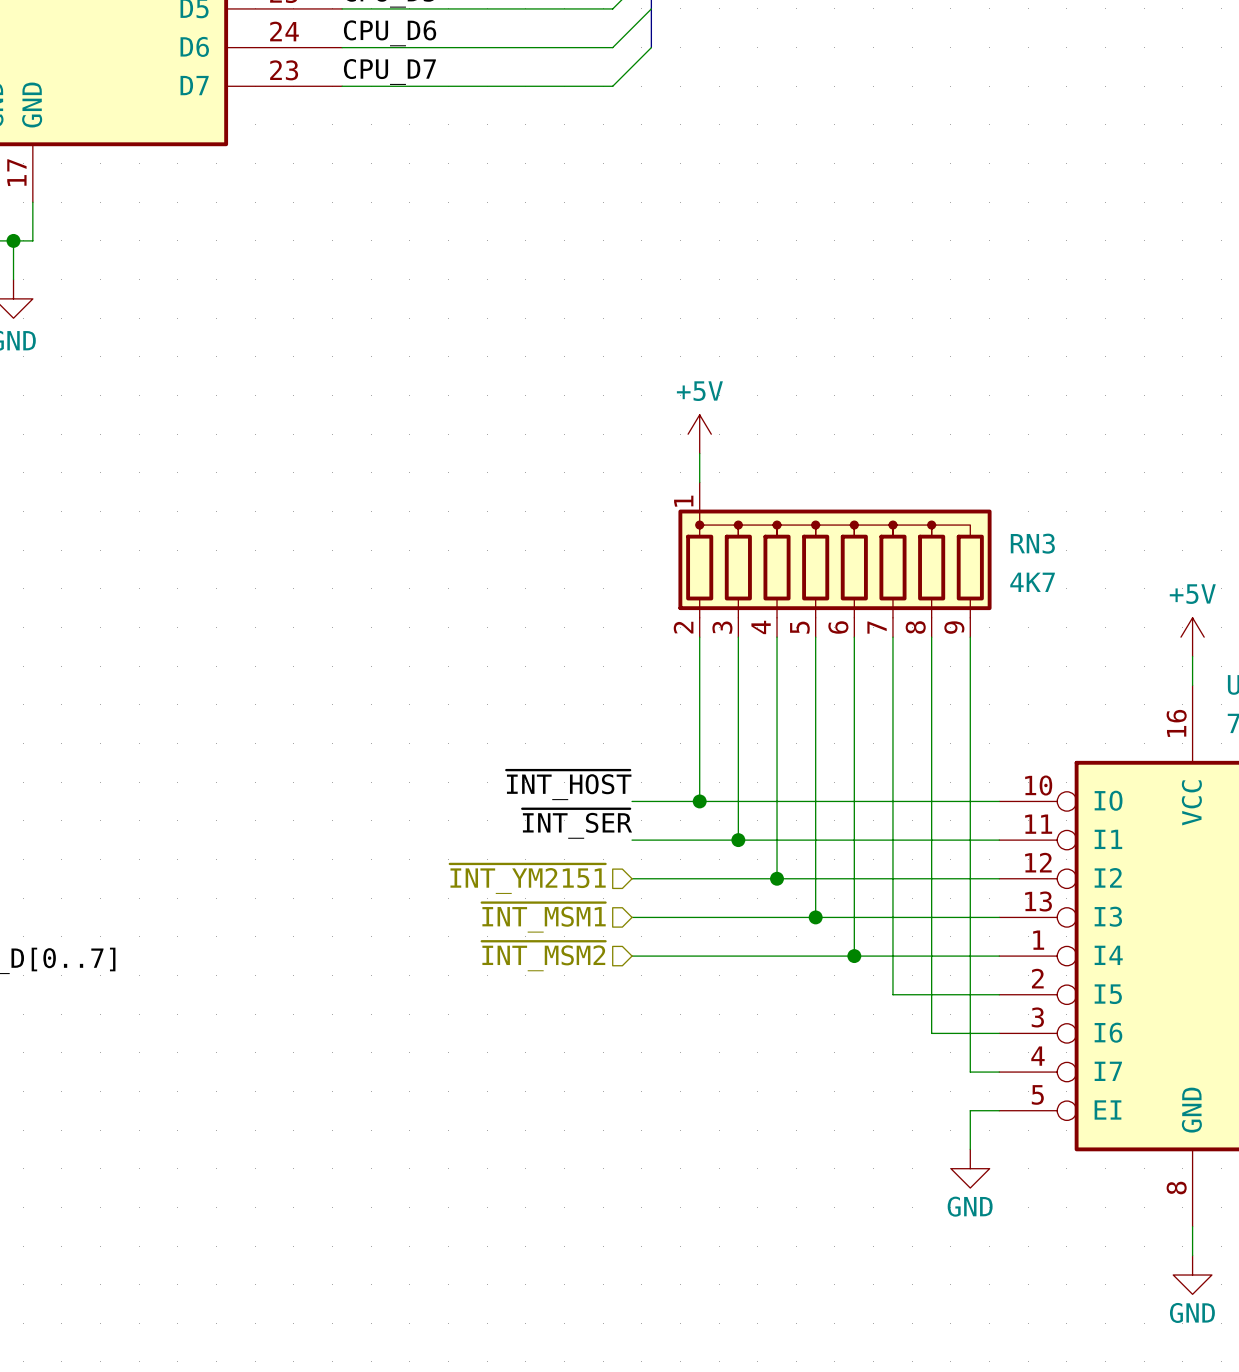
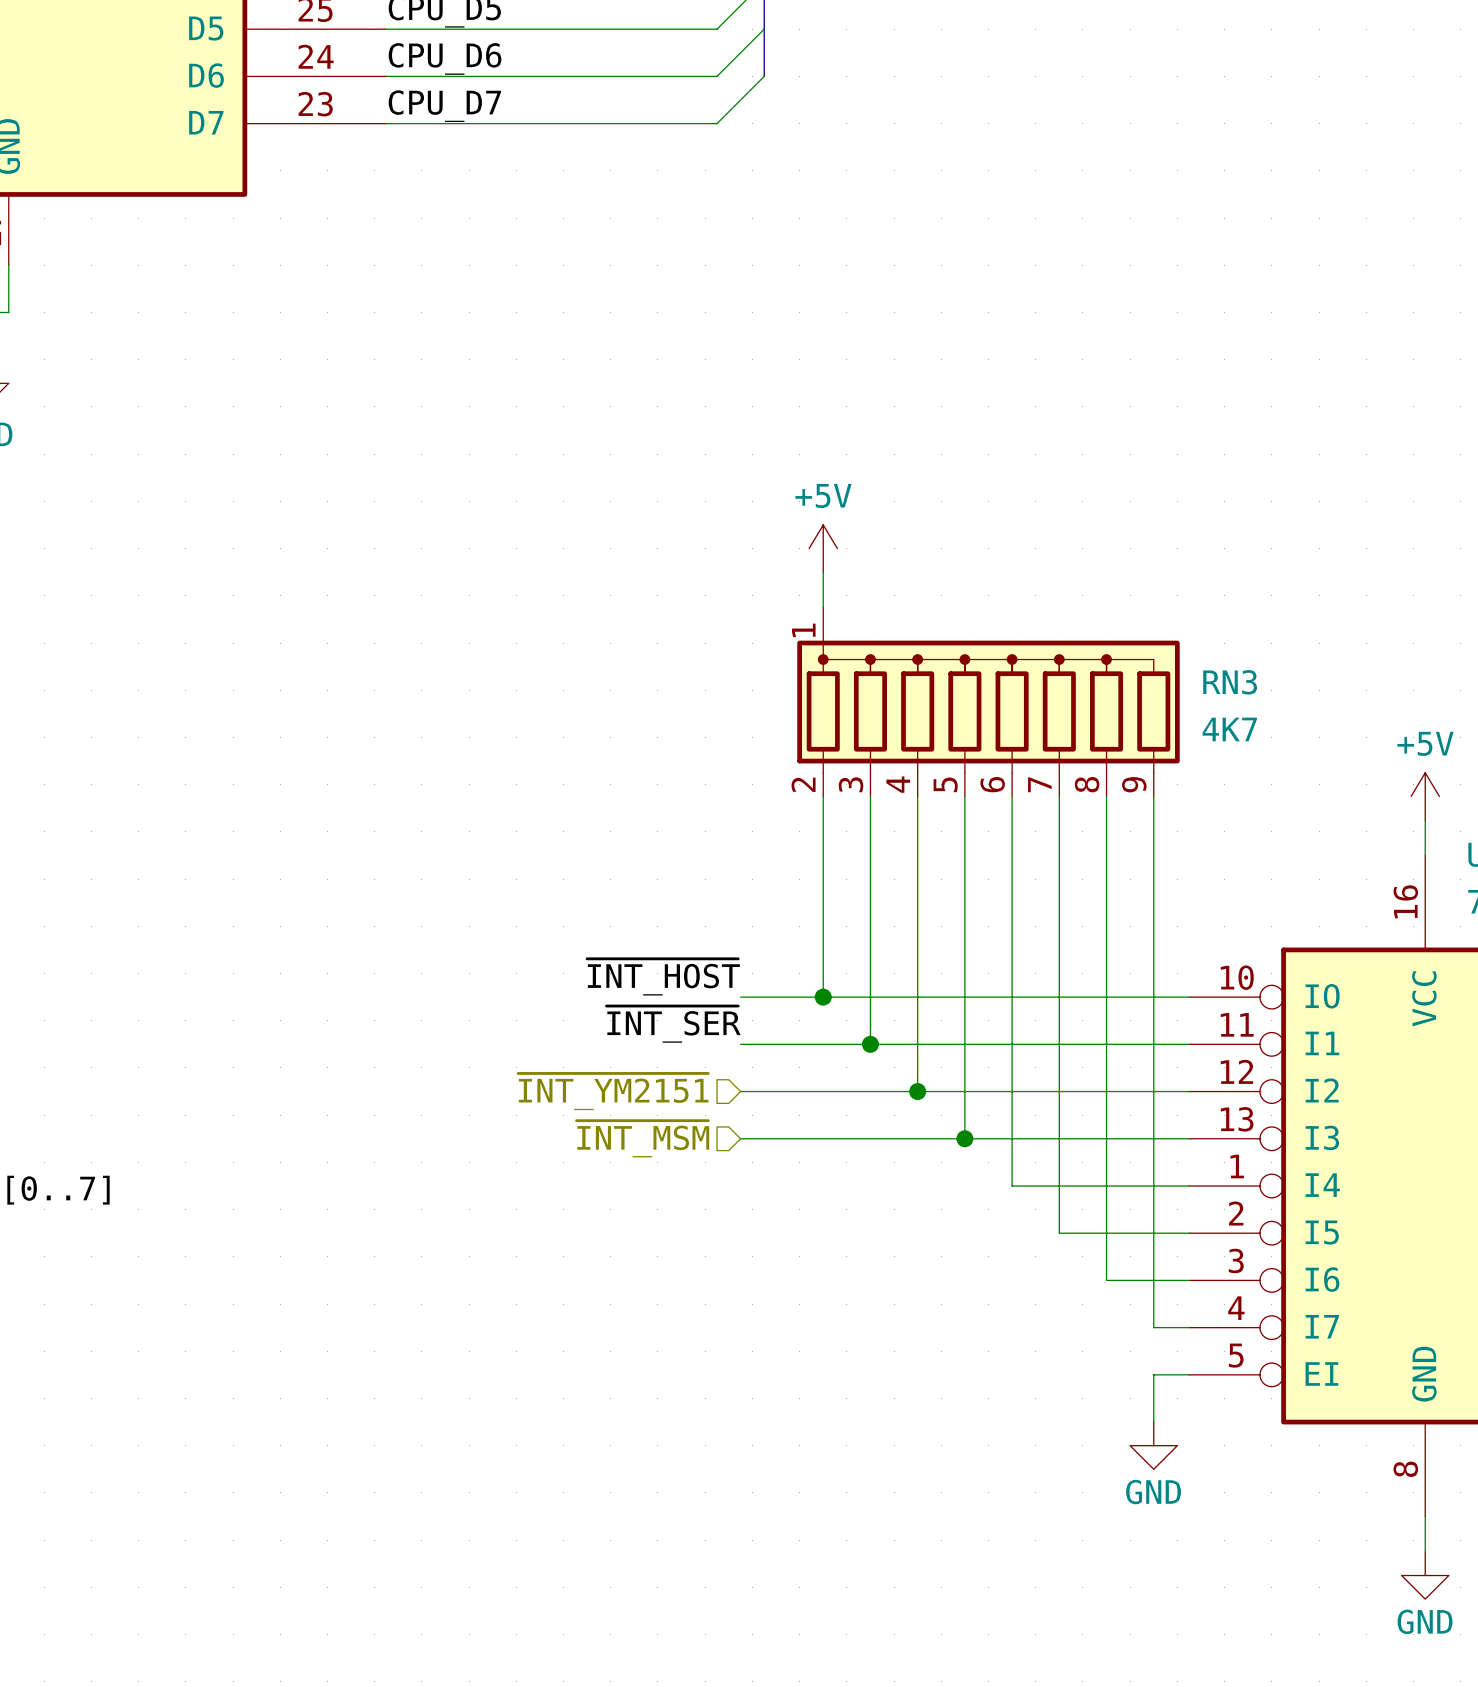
hierarchical label: ~{INT_MSM1} (543, 917) -> ~{INT_MSM} (642, 1138)
hierarchical label: ~{INT_MSM2} (543, 956) -> none
wire: (632, 956) (854, 956) -> none
junction: (854, 956) -> none

